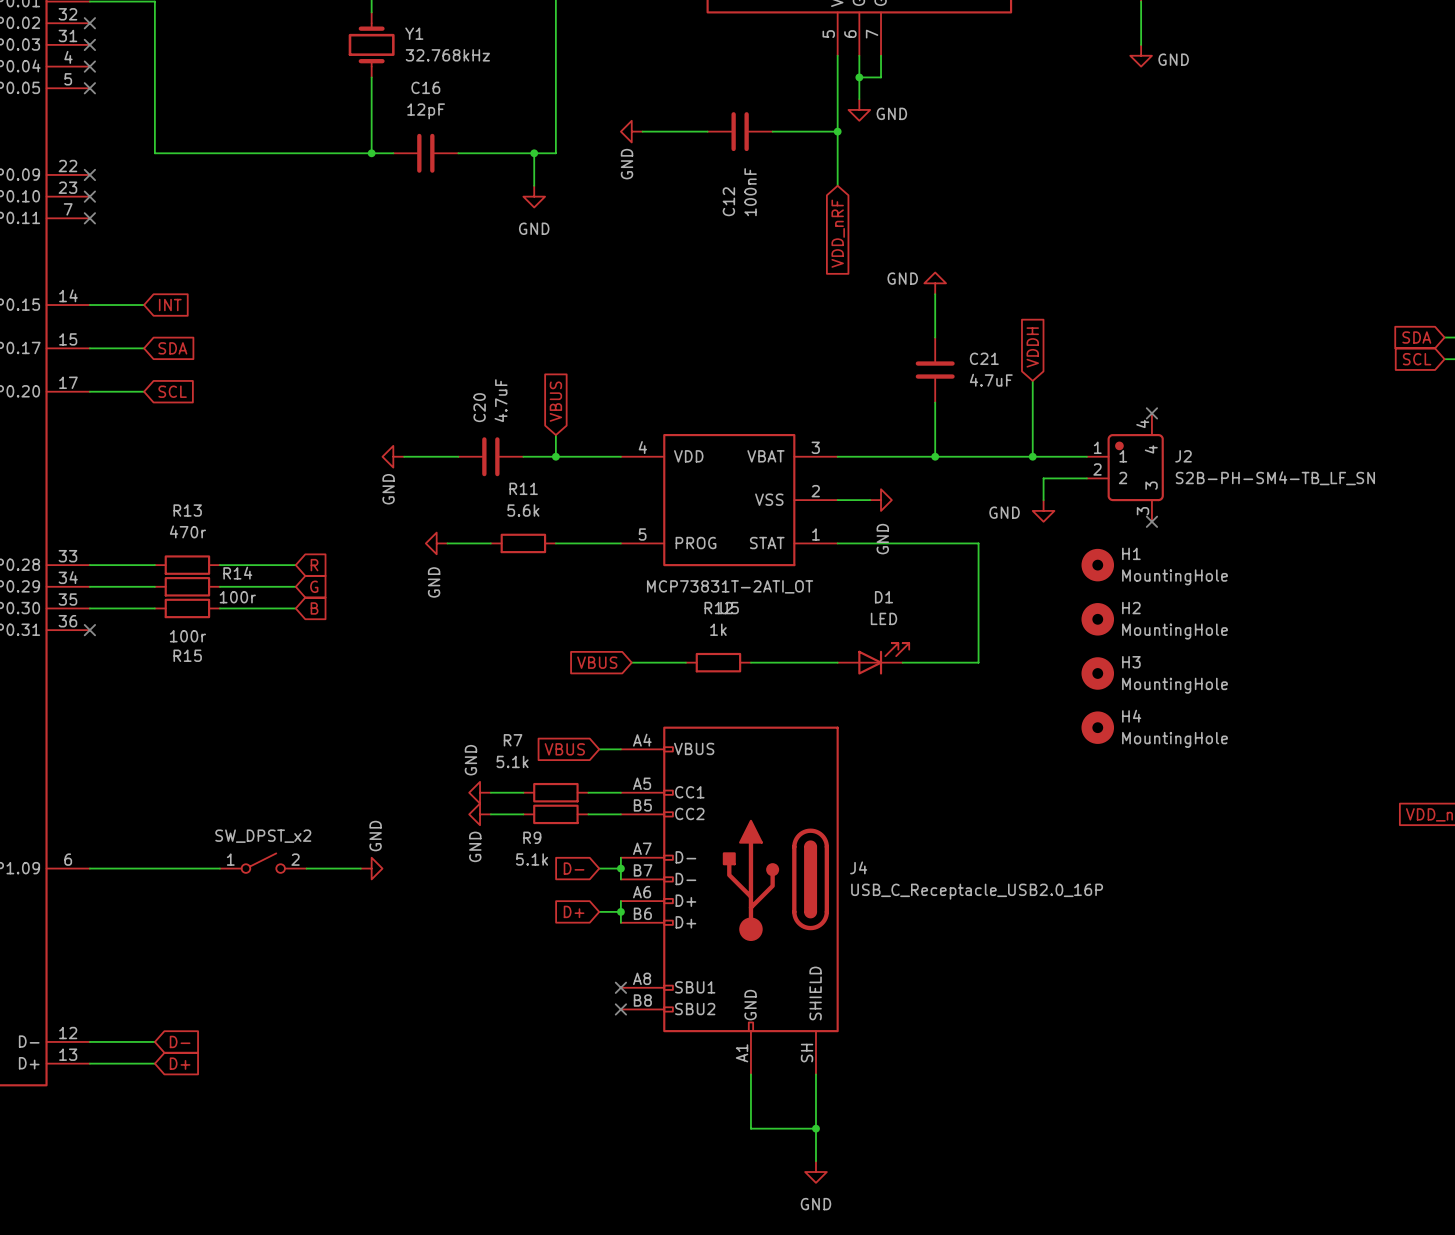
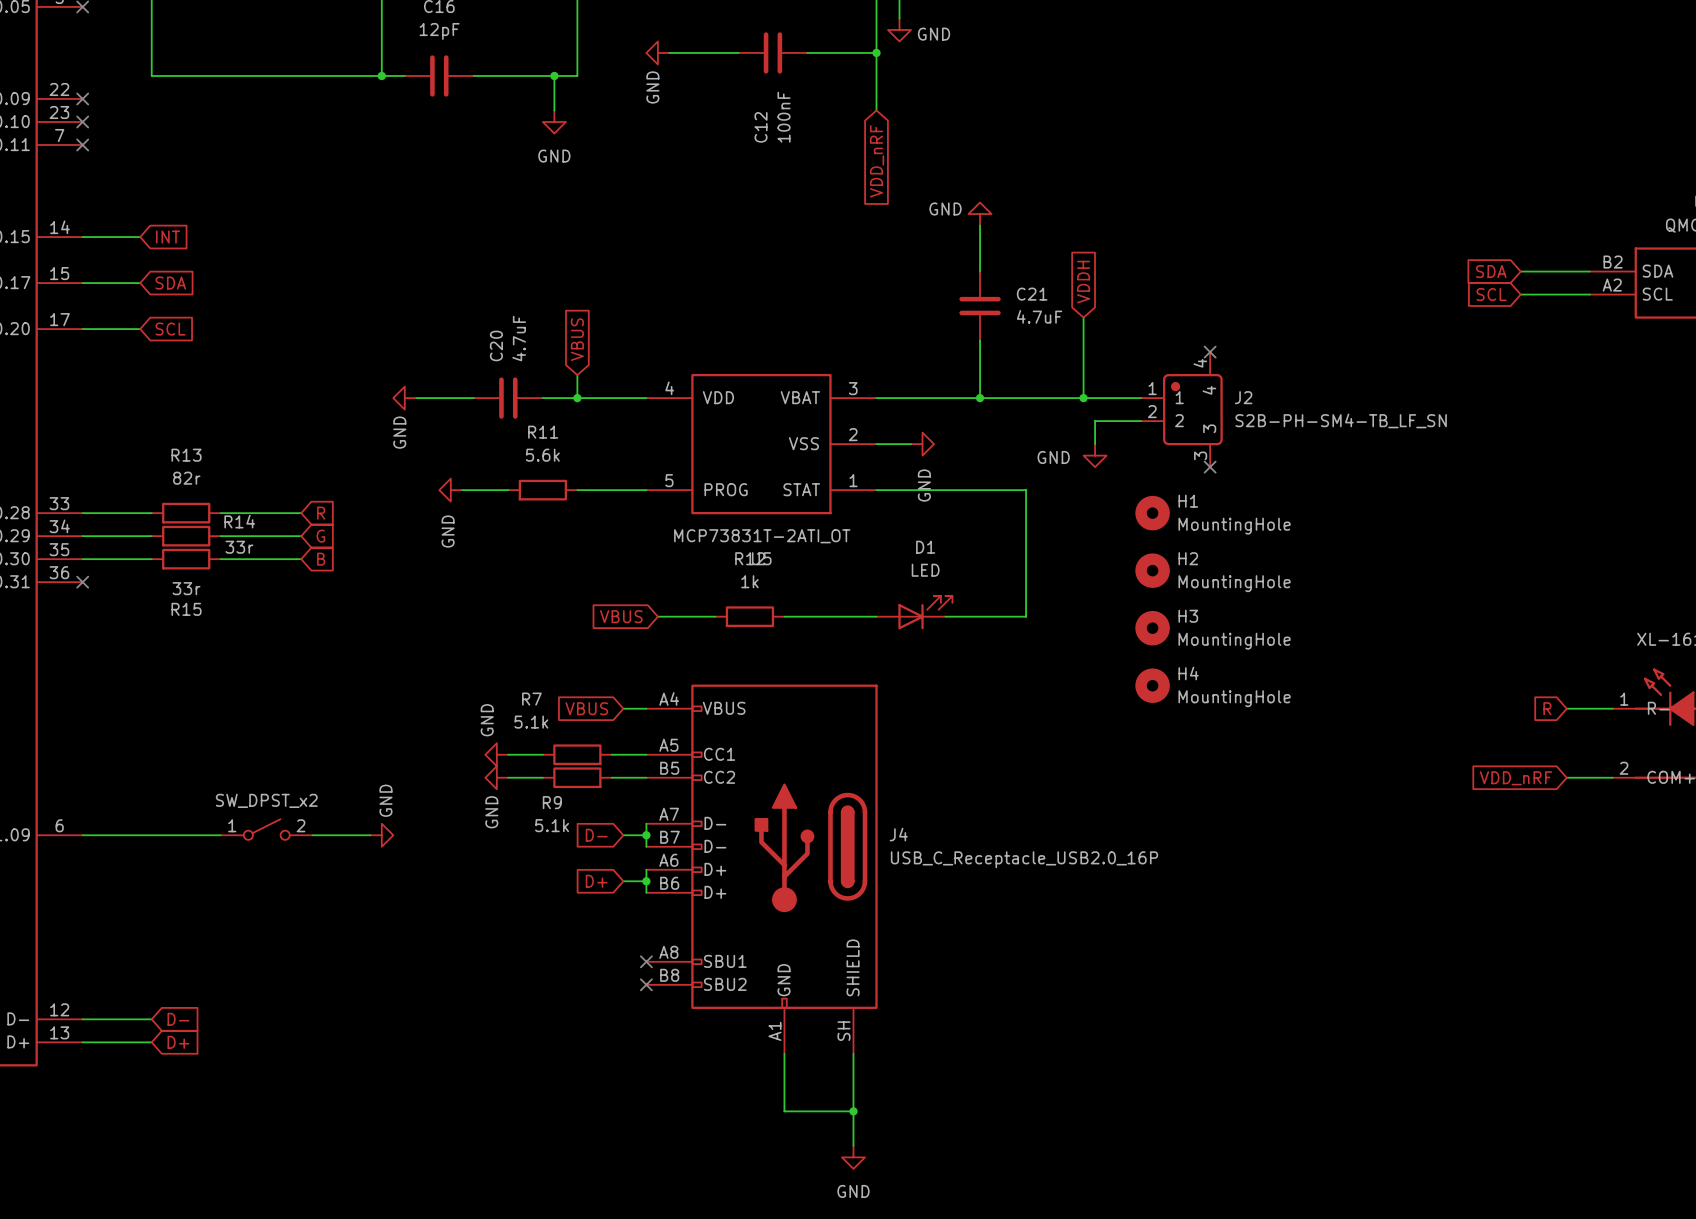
R13 value: 470r (187, 531) -> 82r (186, 478)
R14 value: 100r (237, 597) -> 33r (239, 547)
R15 value: 100r (187, 636) -> 33r (186, 588)

